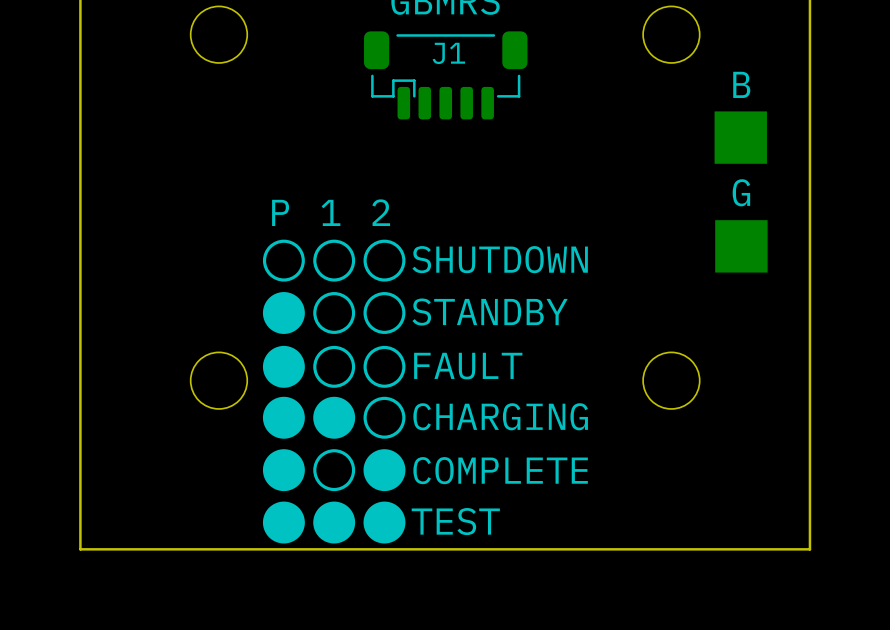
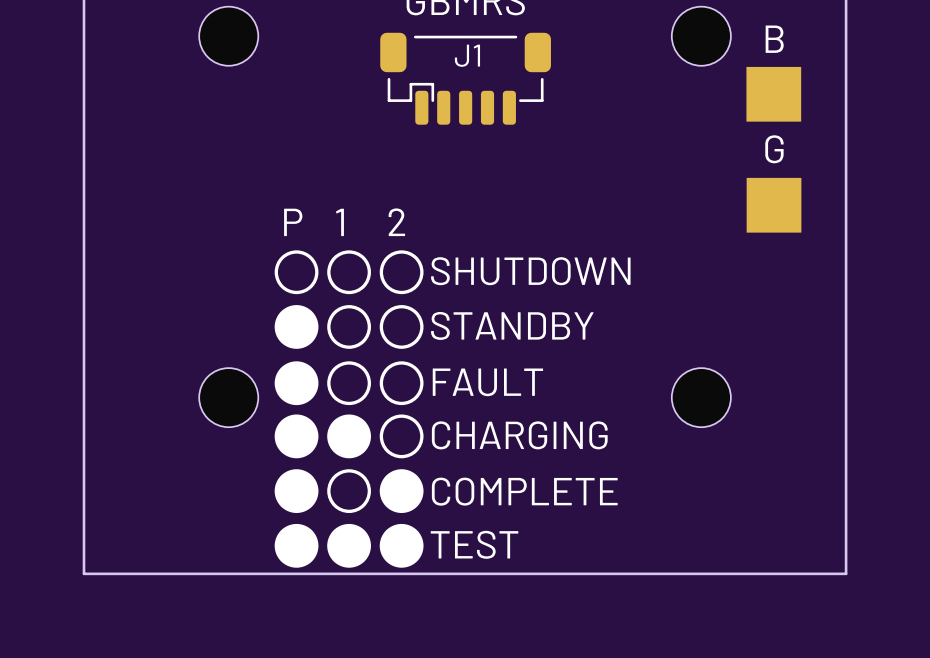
part position: (740, 137) -> (773, 94)
part position: (741, 246) -> (774, 205)

